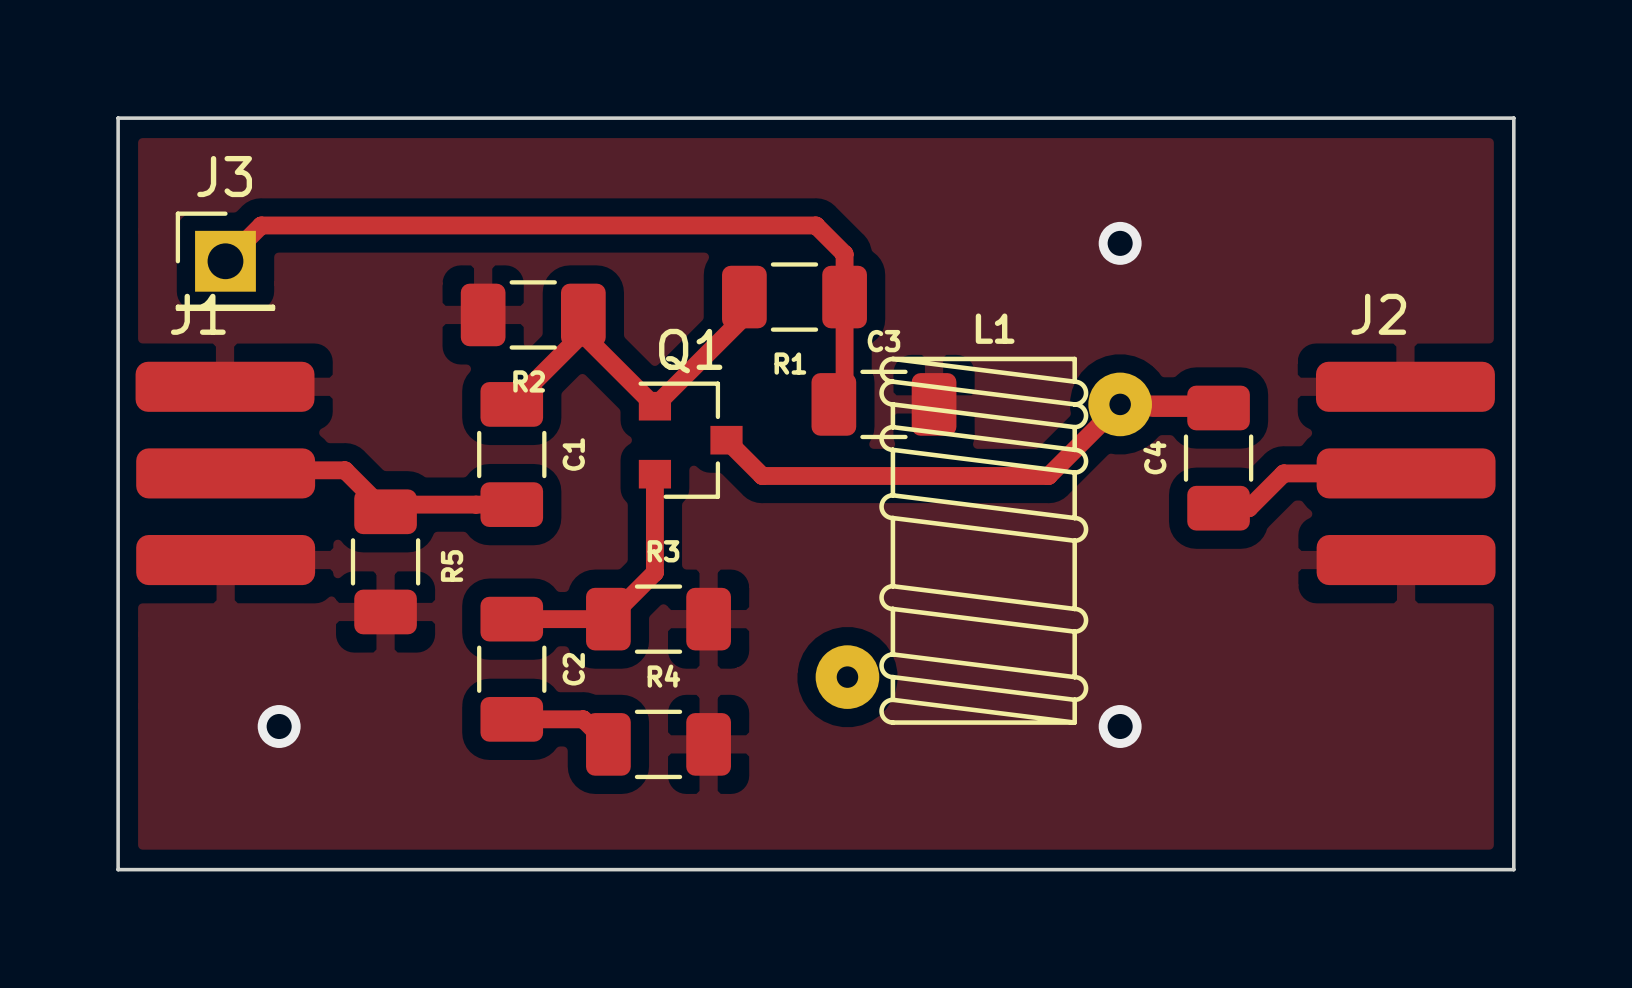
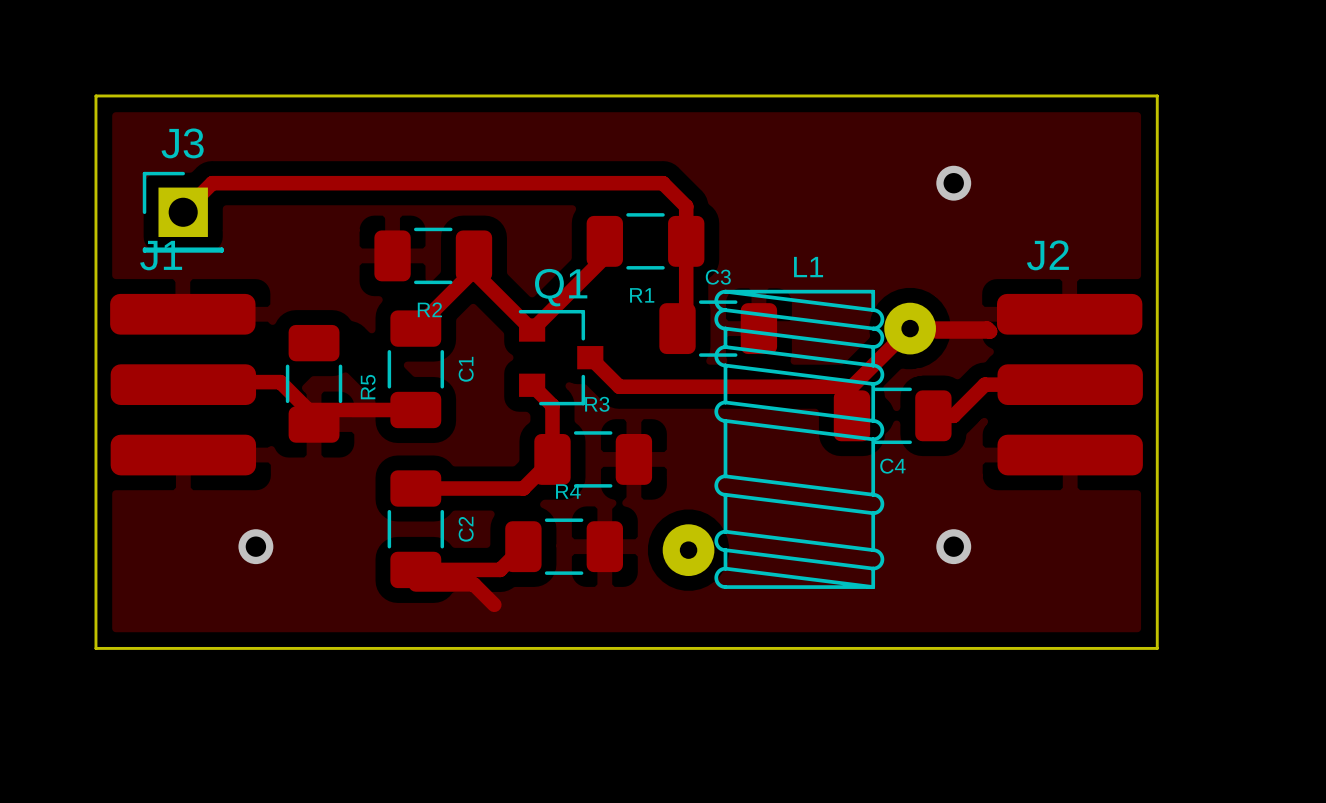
board edge: (1424, 118) (1513, 118) (1513, 869) (118, 869) (118, 798) -> (1157, 95) (1157, 648) (95, 648)
via position: (1120, 243) -> (953, 183)
C4 name position: C4 (1154, 457) -> C4 (892, 466)
C4 rotation: 0° (1218, 458) -> 90° clockwise (892, 415)
C4 position: (1218, 458) -> (892, 415)
track: (1283, 473) (1248, 508) (1218, 508) -> (1043, 384) (984, 384) (953, 415) (933, 415)
J2 position: (1405, 473) -> (1069, 384)
track: (654, 474) (654, 572) (608, 619) (511, 619) -> (532, 385) (552, 405) (552, 459) (523, 488) (415, 488)
R5 position: (385, 561) -> (314, 383)
R3 position: (658, 619) -> (593, 459)
C2 position: (511, 669) -> (415, 529)
track: none -> (523, 546) (500, 569) (415, 569)
via position: (279, 726) -> (255, 546)
via position: (1120, 726) -> (953, 546)
R4 position: (658, 744) -> (564, 546)

